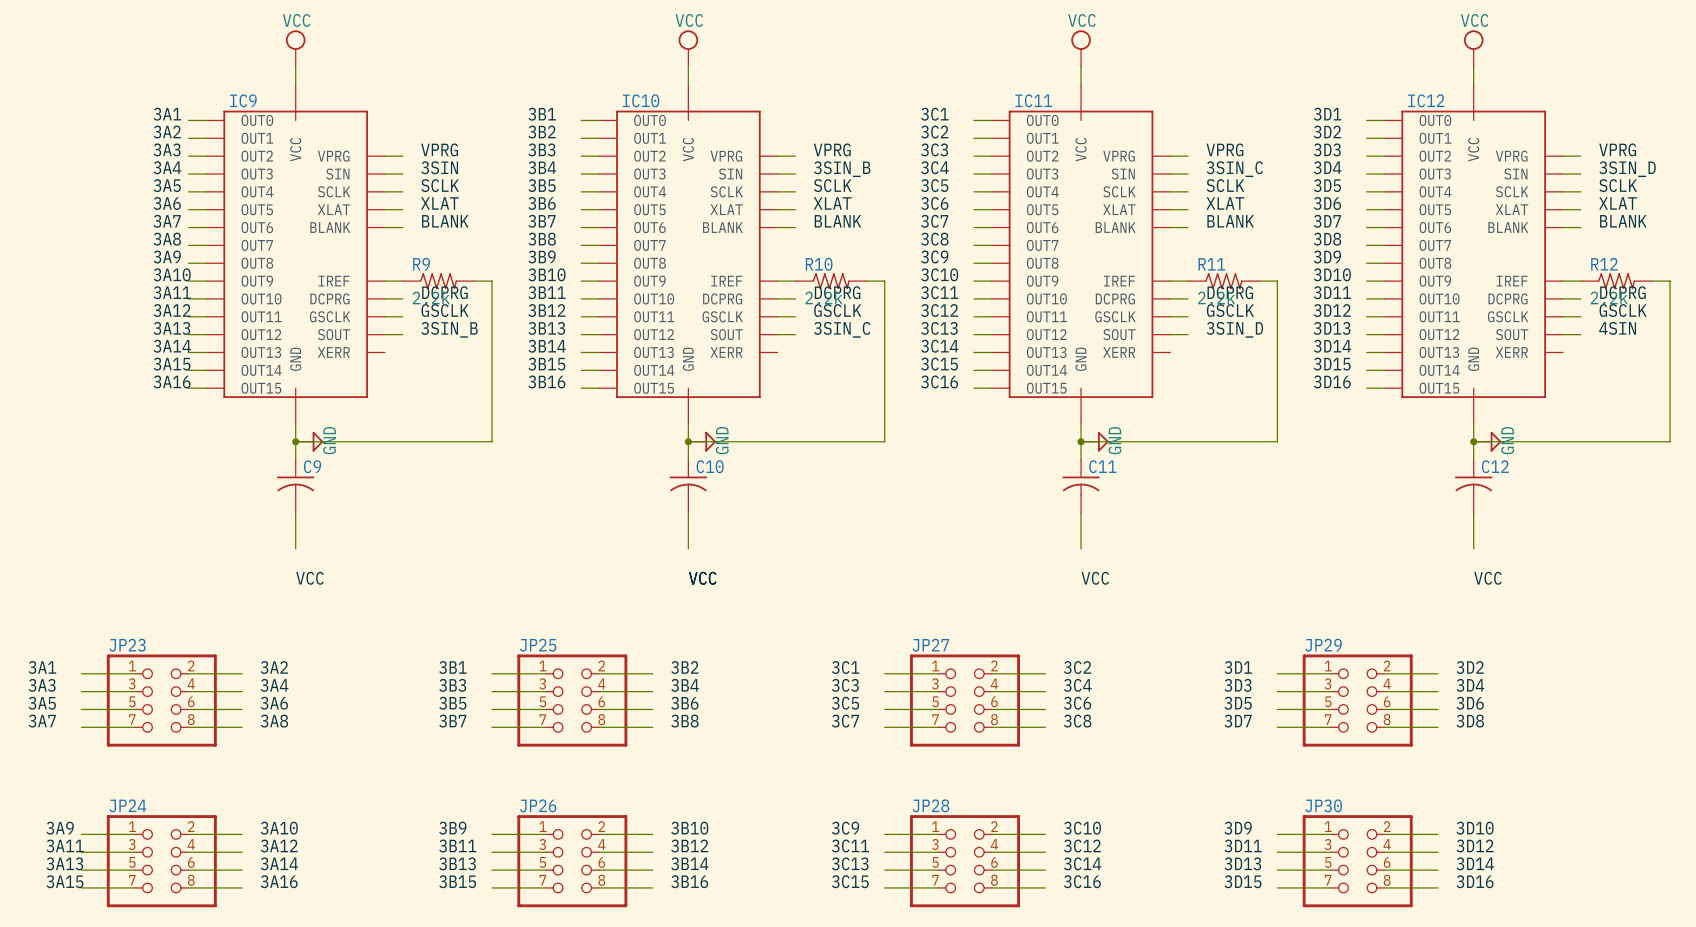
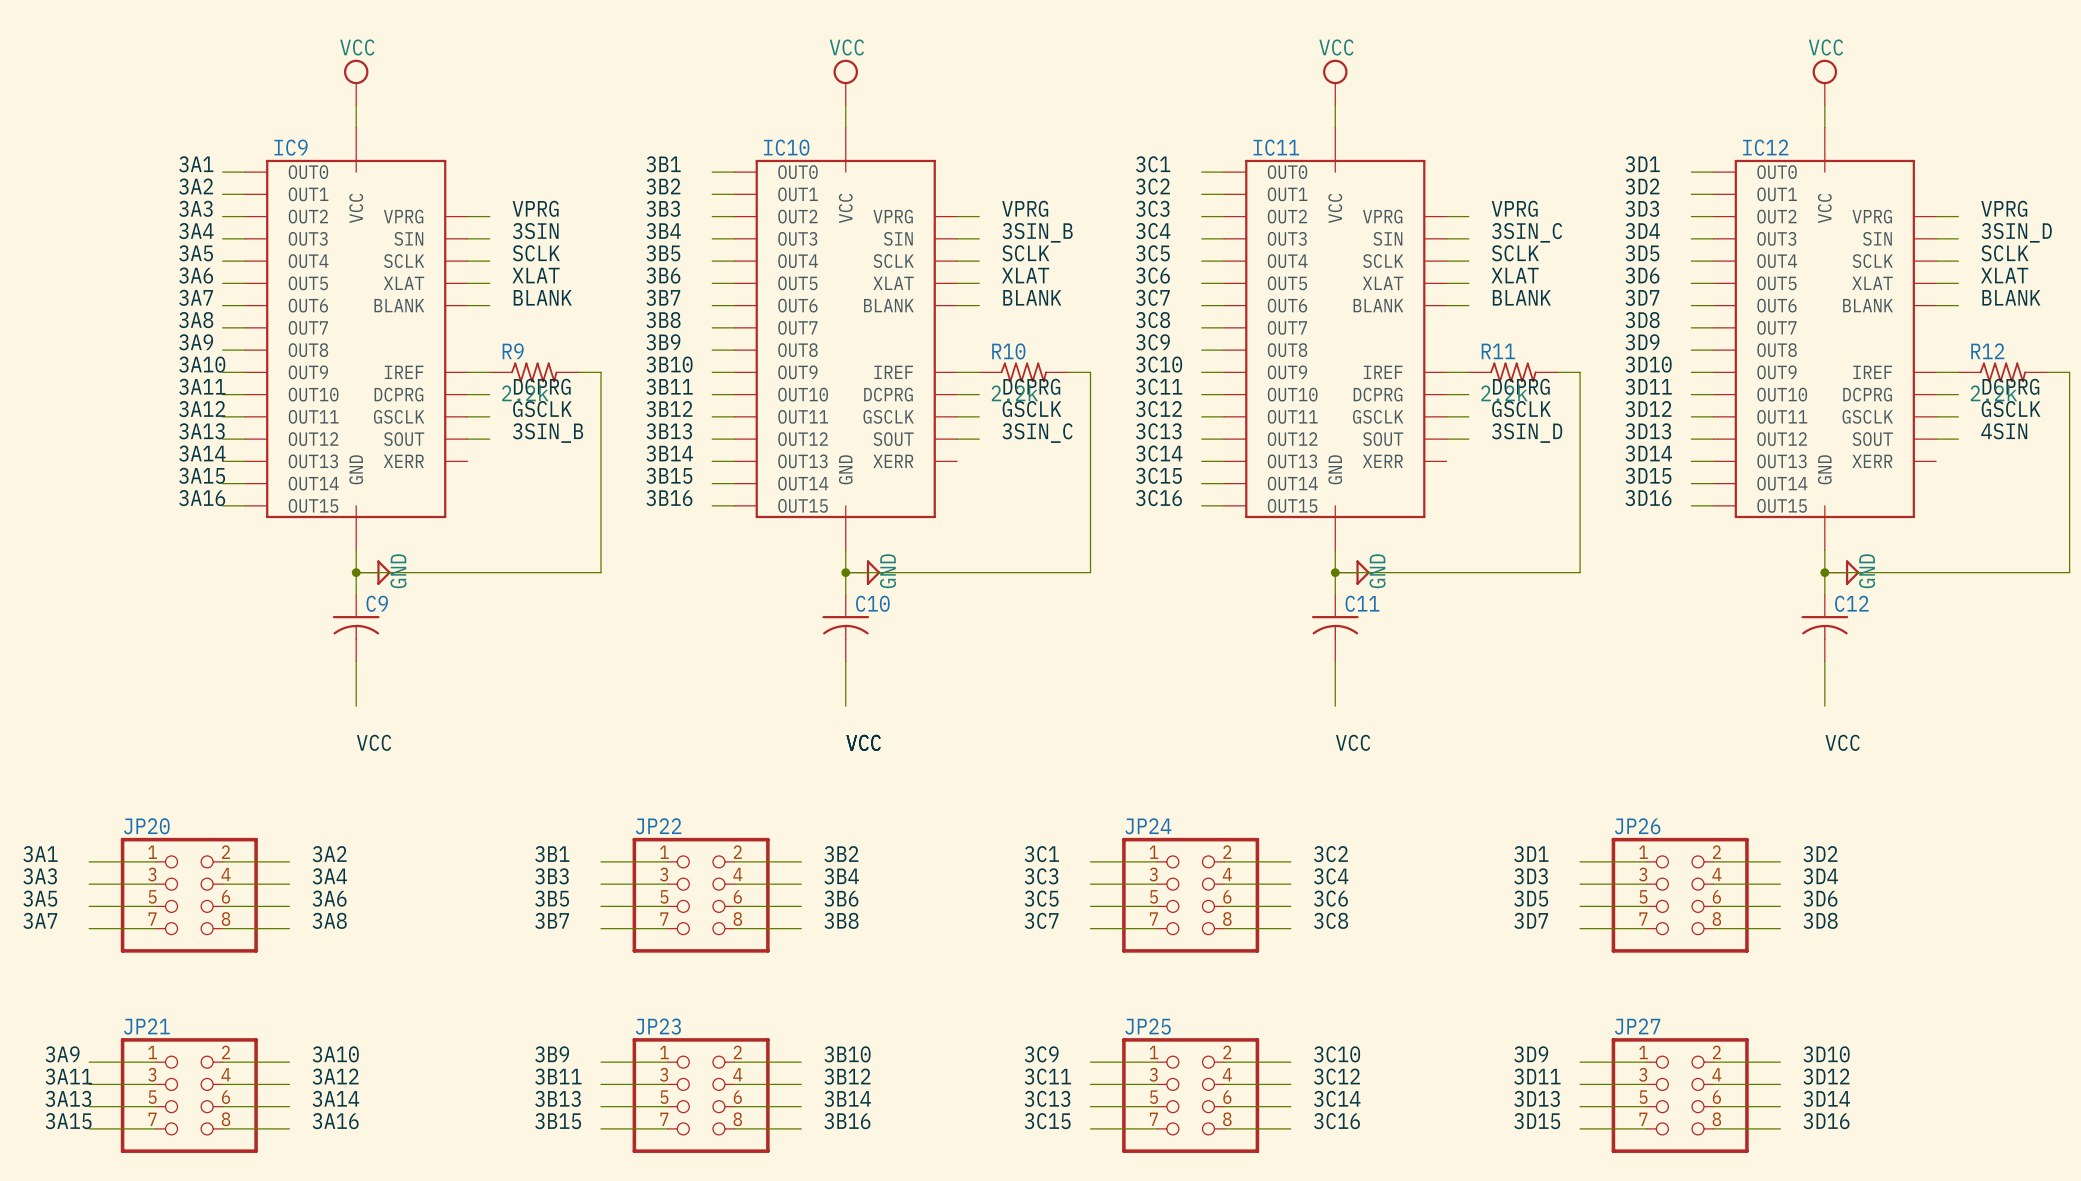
JP23 name: JP23 (127, 645) -> JP20 (146, 826)
JP25 name: JP25 (538, 645) -> JP22 (658, 826)
JP27 name: JP27 (930, 645) -> JP24 (1148, 826)
JP29 name: JP29 (1323, 645) -> JP26 (1637, 826)
JP24 name: JP24 (127, 805) -> JP21 (146, 1026)
JP26 name: JP26 (538, 805) -> JP23 (658, 1026)
JP28 name: JP28 (930, 805) -> JP25 (1148, 1026)
JP30 name: JP30 (1323, 805) -> JP27 (1637, 1026)

